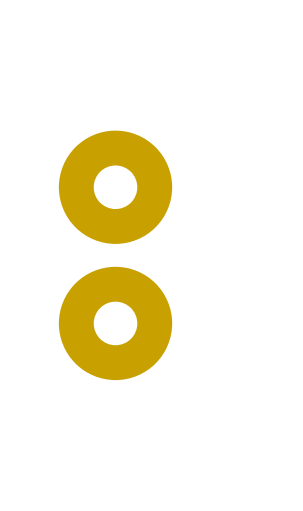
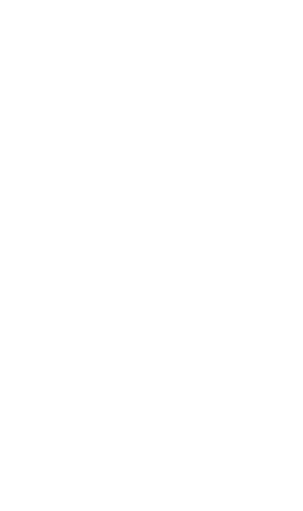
part: (115, 255) -> none

